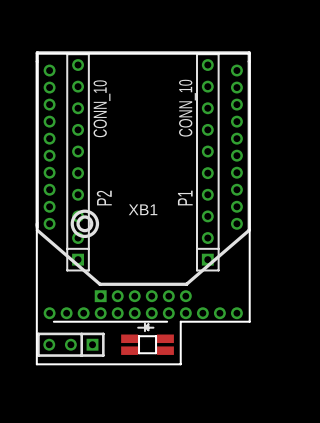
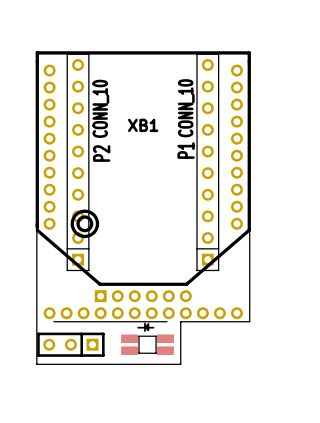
P2 name position: P2 (104, 198) -> P2 (101, 153)
P1 name position: P1 (185, 198) -> P1 (186, 150)
XB1 name position: XB1 (143, 209) -> XB1 (143, 125)

